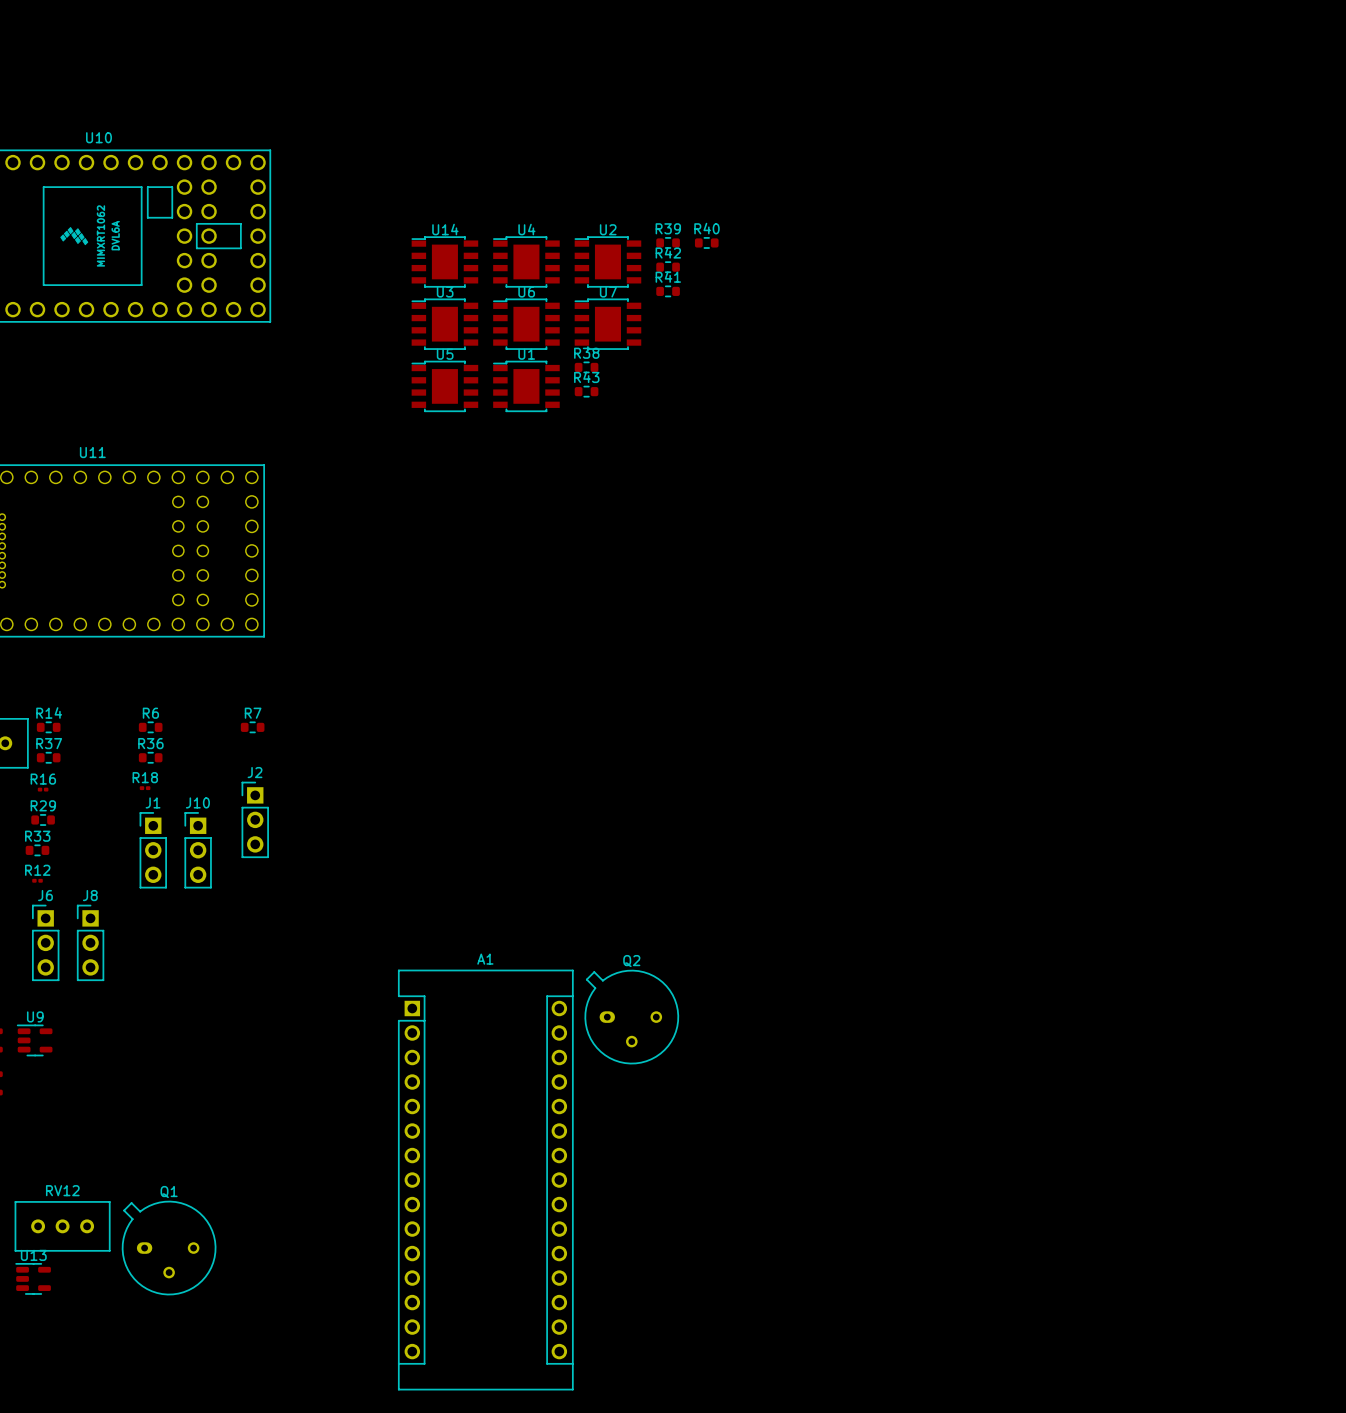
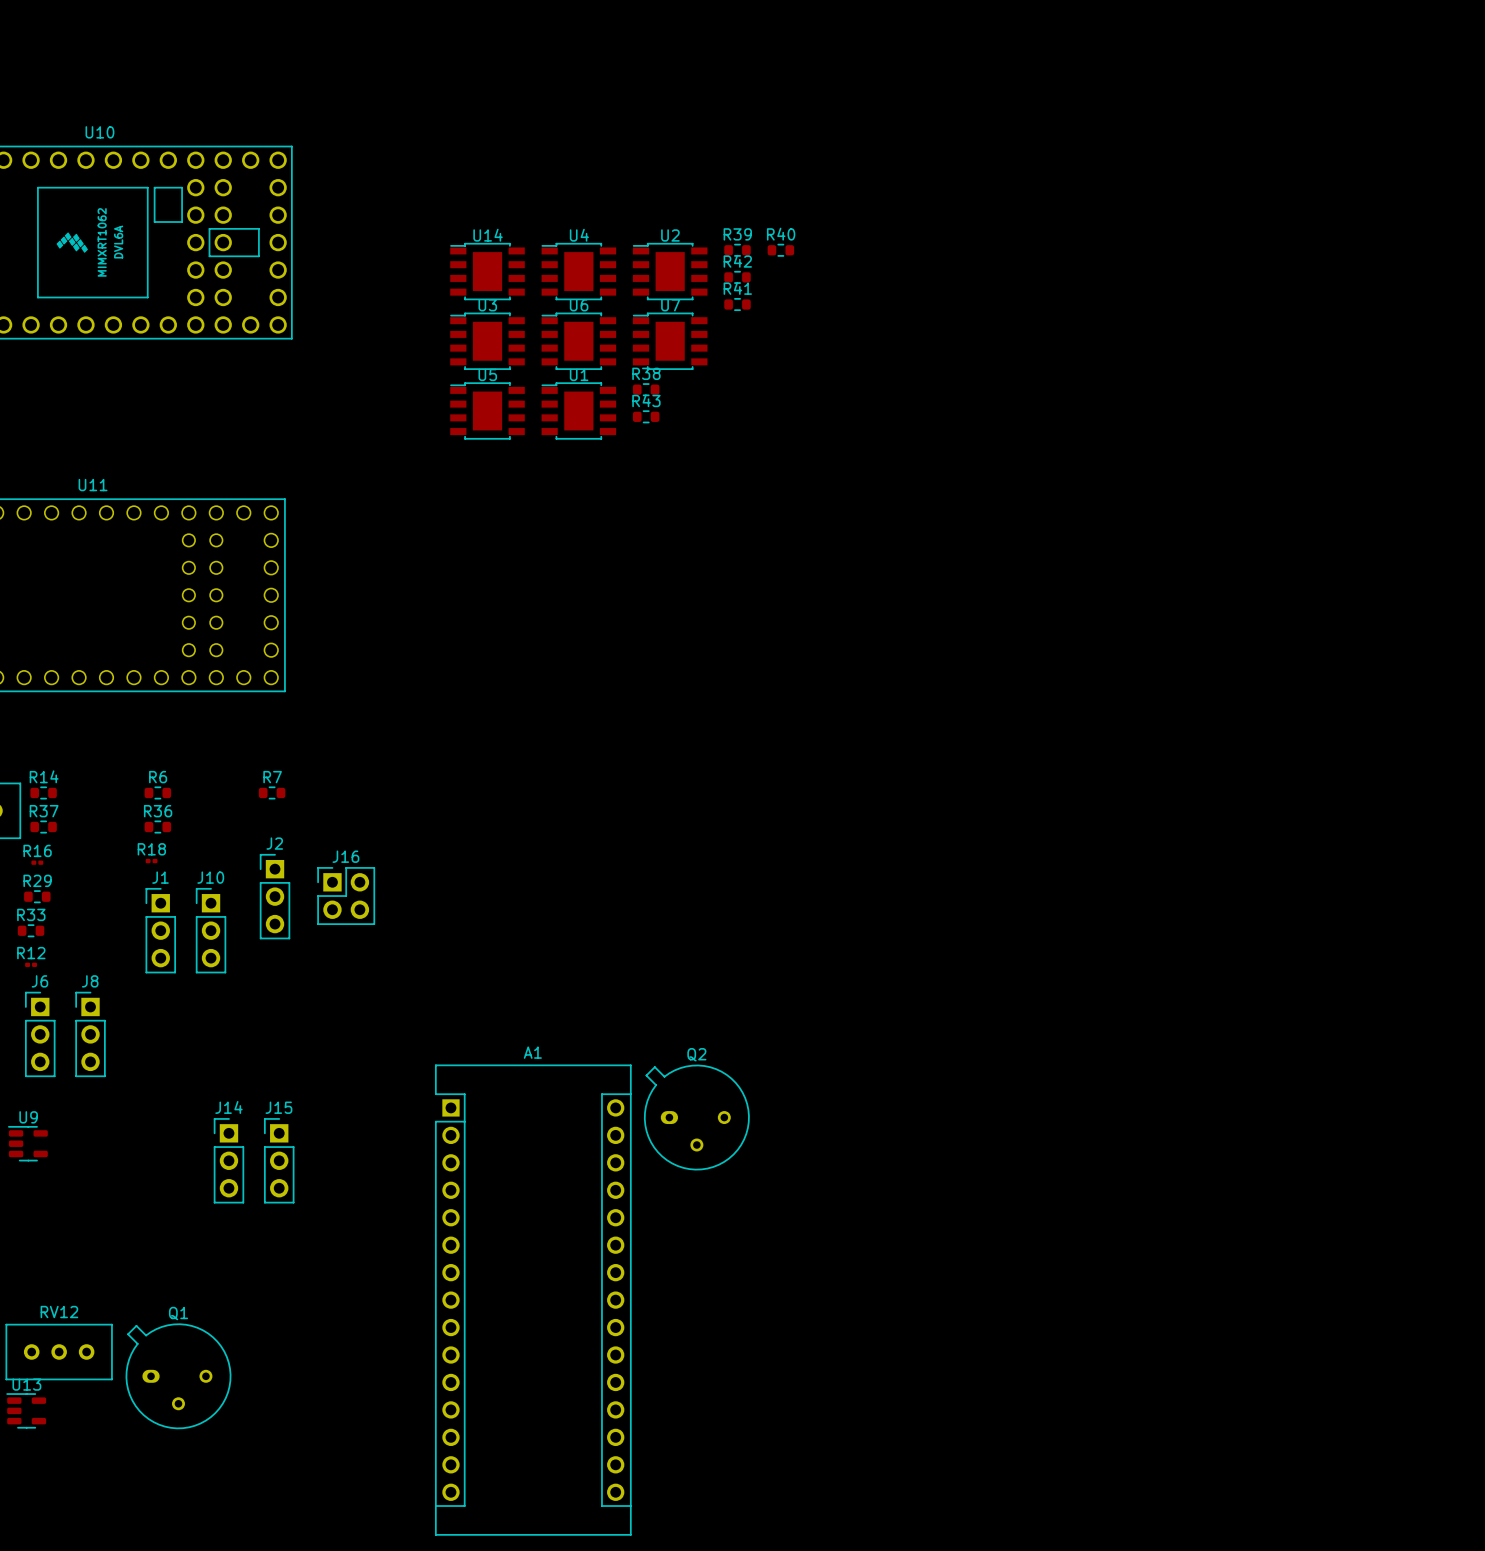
J16: none -> (346, 896)
J14: none -> (228, 1160)
J15: none -> (279, 1160)

